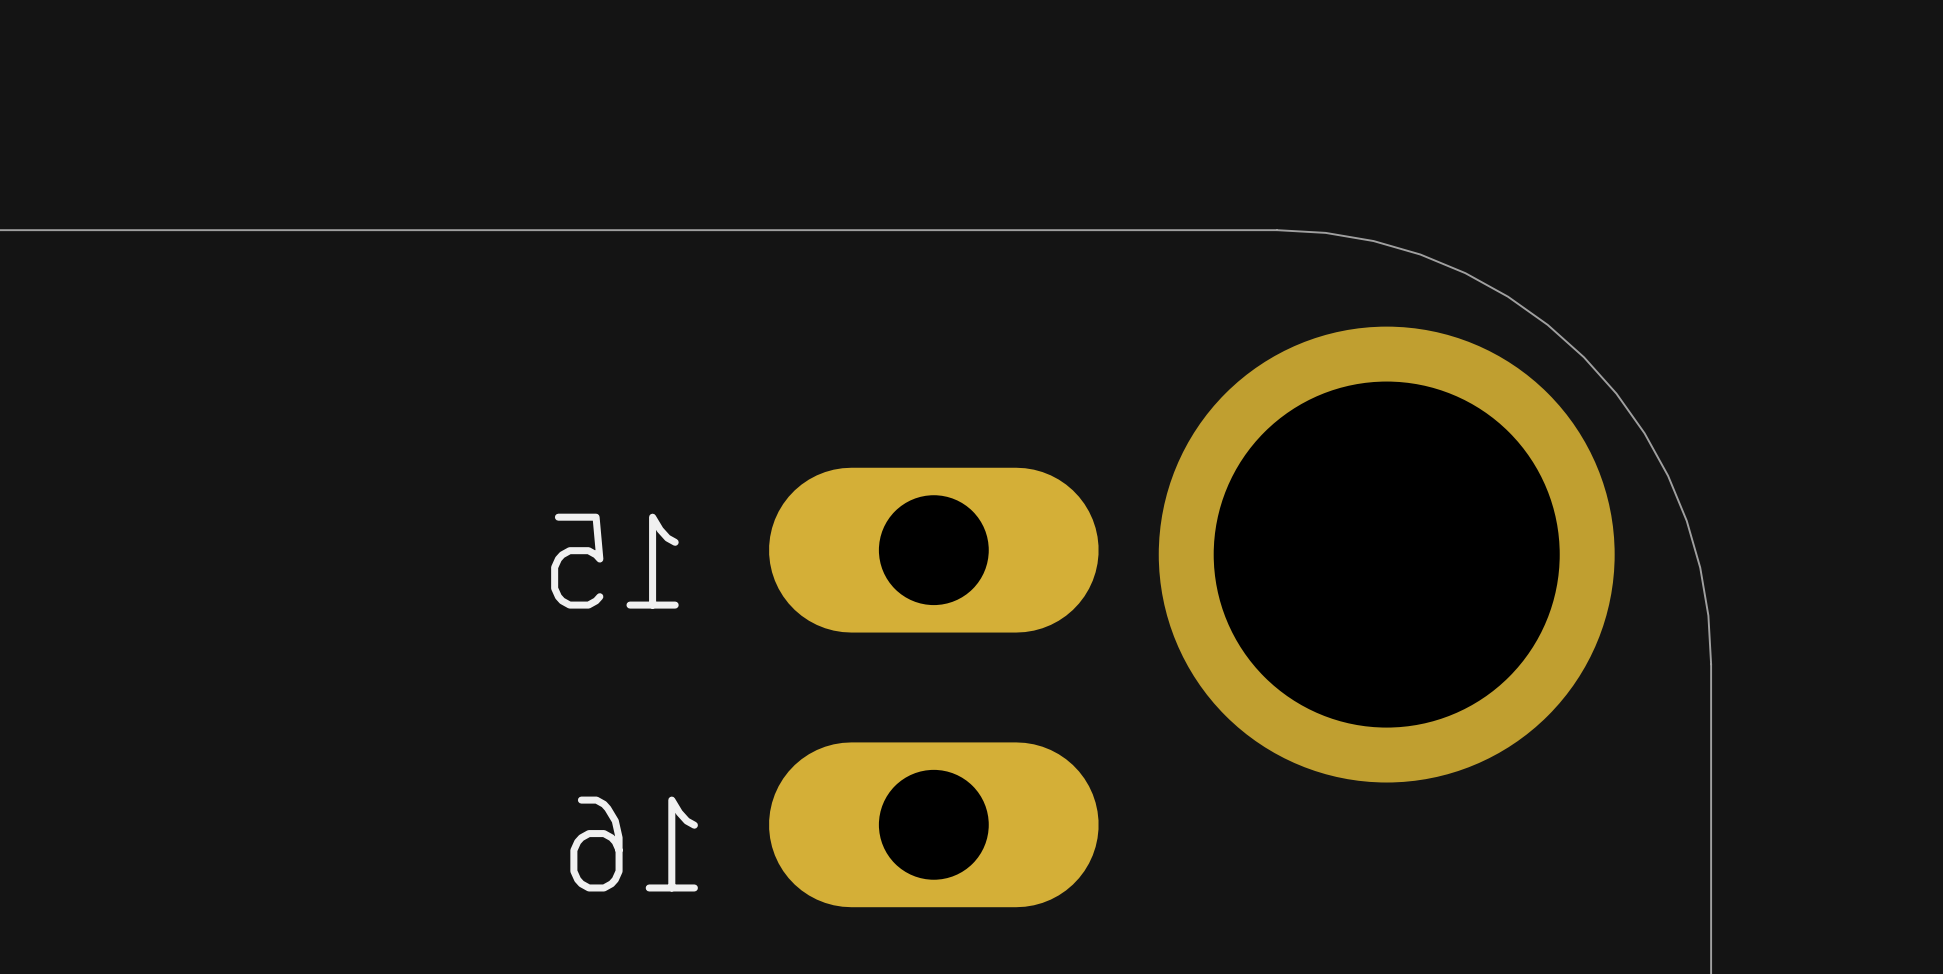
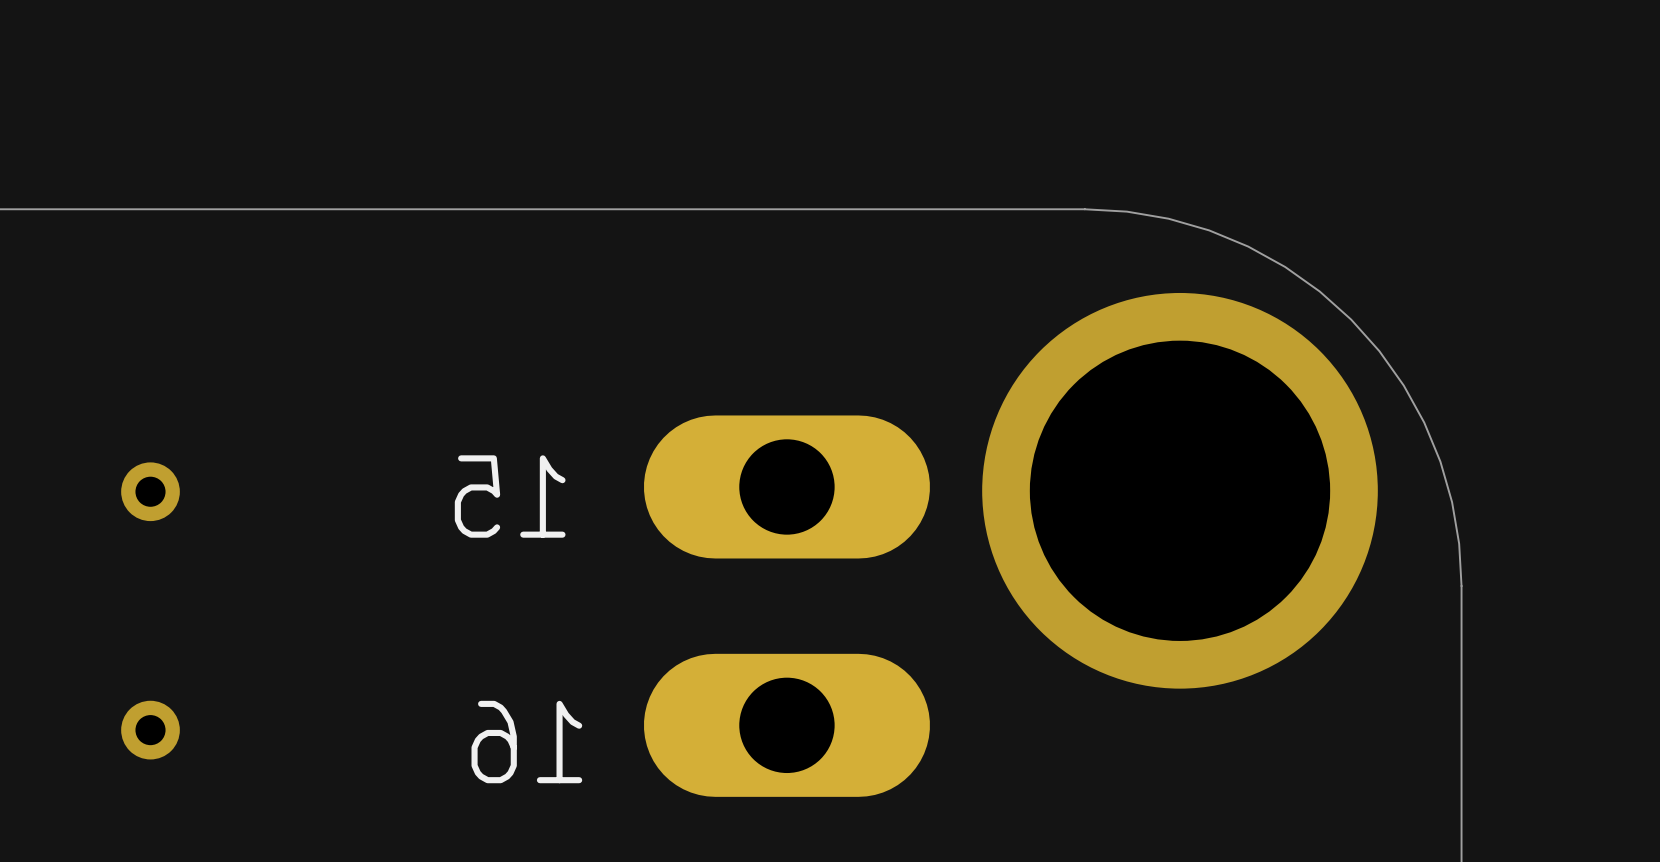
via: none -> (150, 491)
via: none -> (150, 730)

